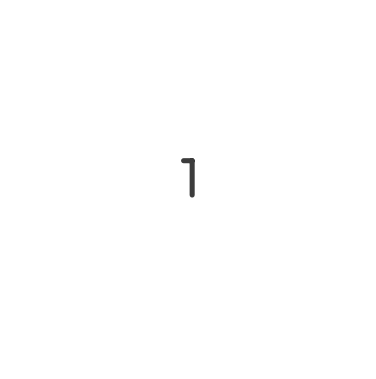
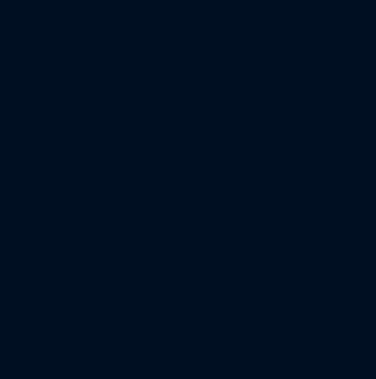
line: (183, 160) (192, 160) (192, 195) -> none

